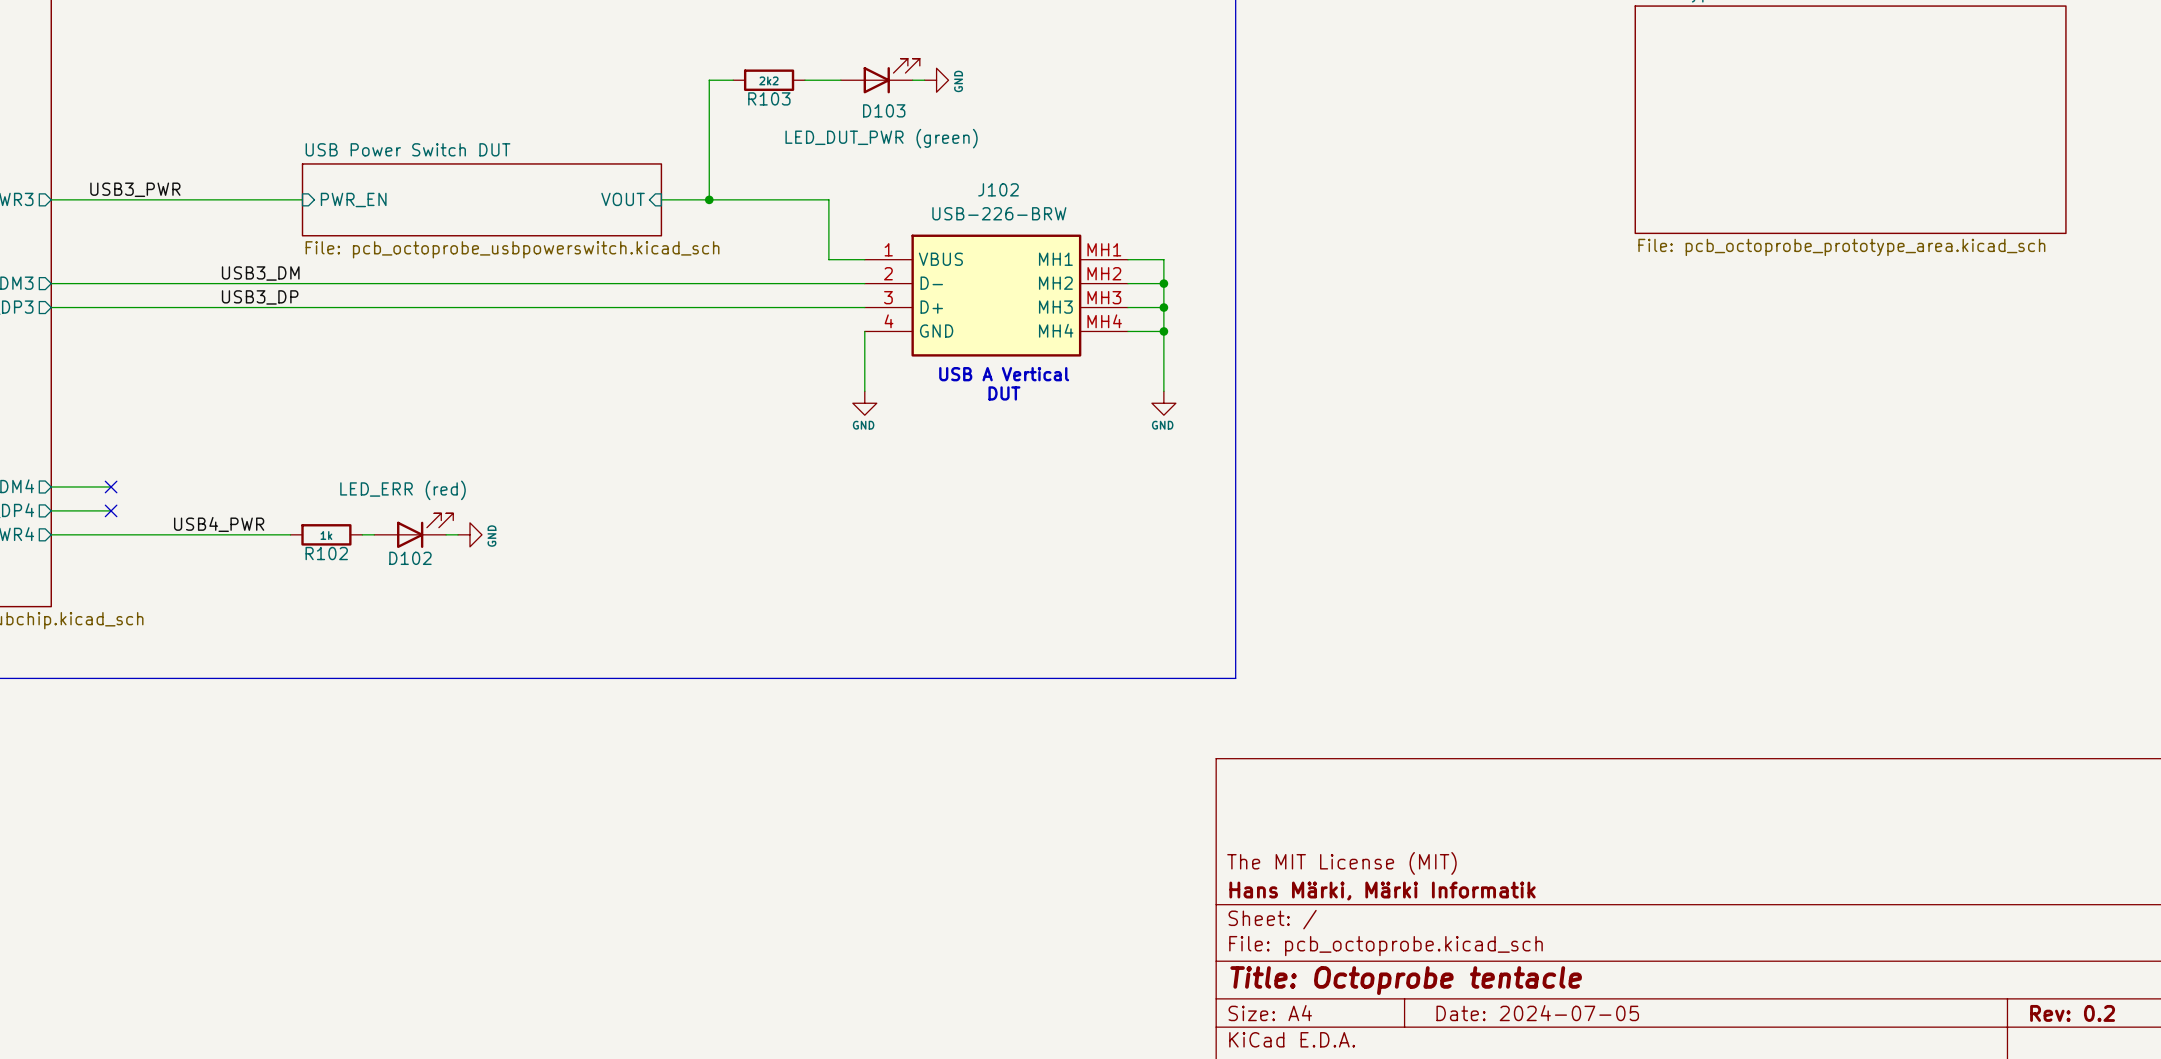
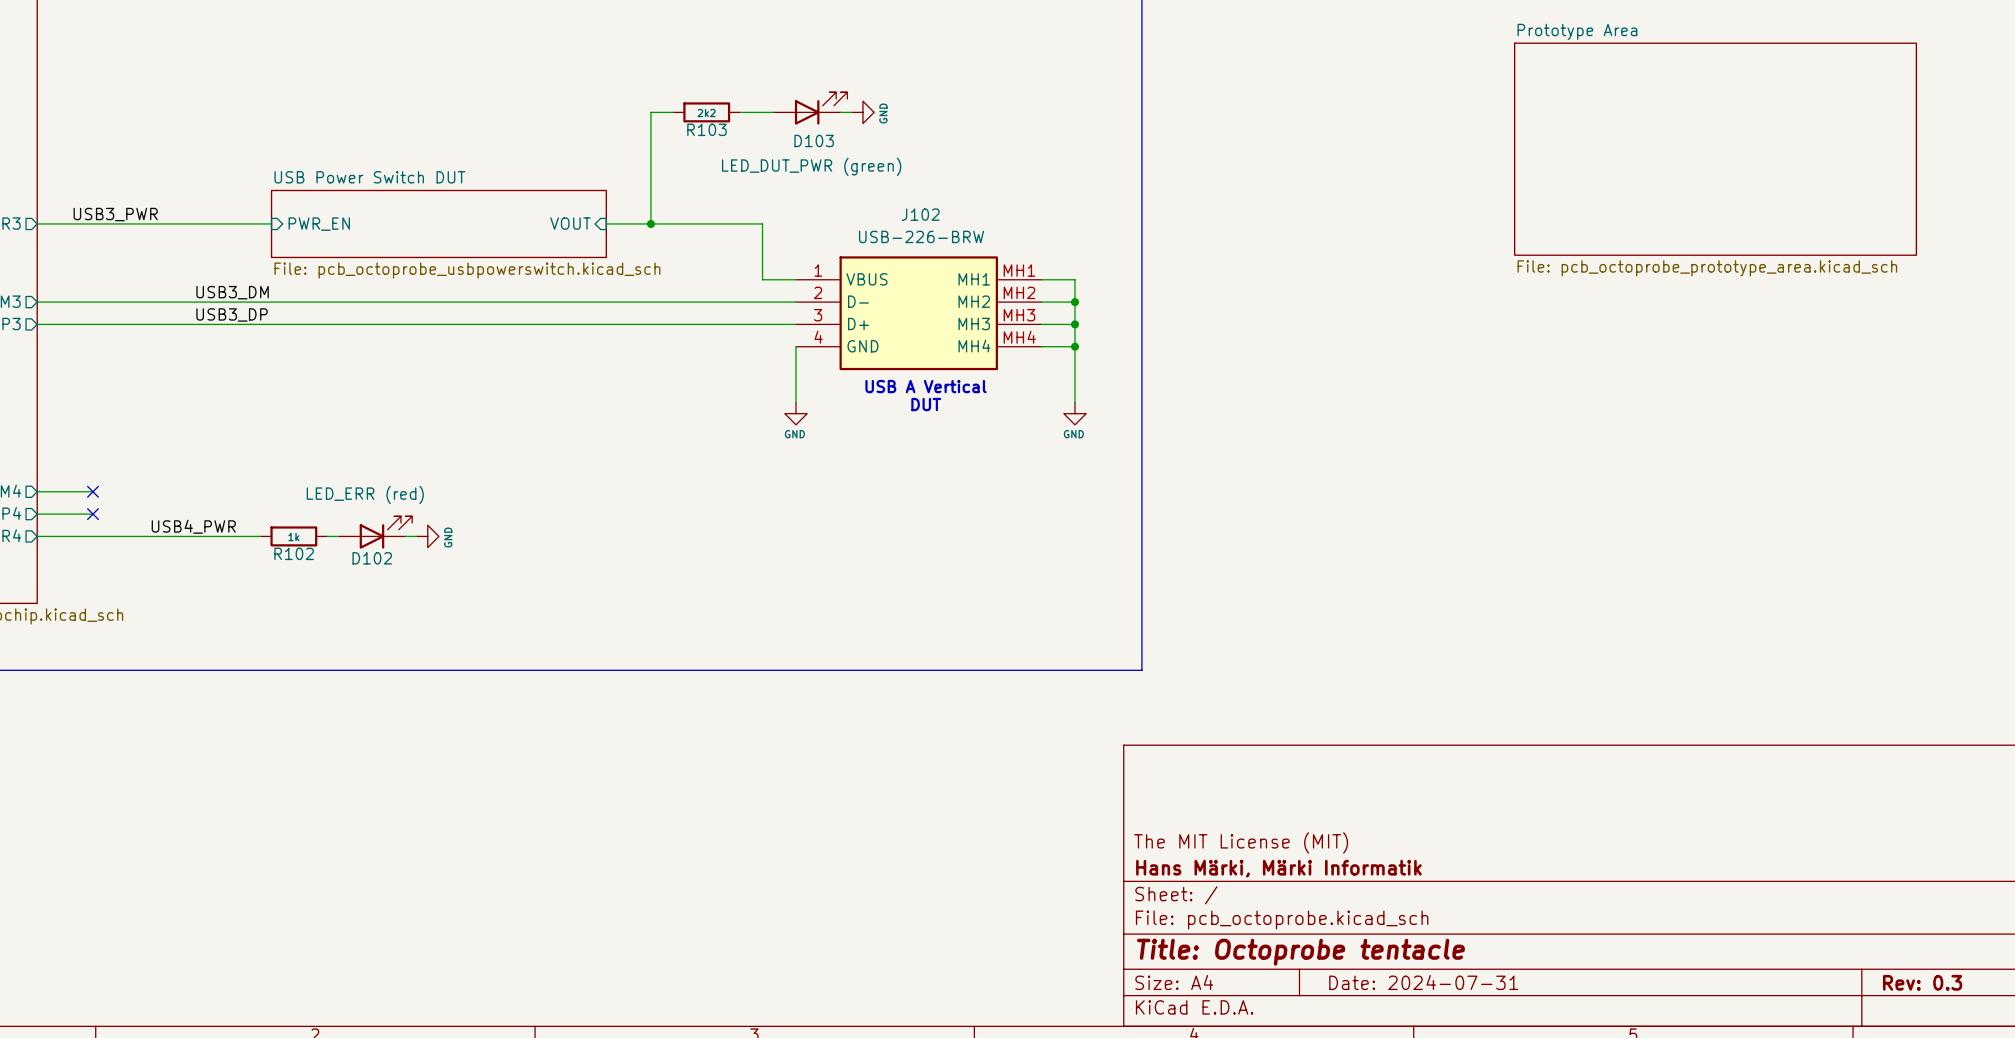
title block: Date: 2024-07-05 (1537, 1013) -> Date: 2024-07-31 (1423, 982)
title block: Rev: 0.2 (2072, 1013) -> Rev: 0.3 (1922, 982)

